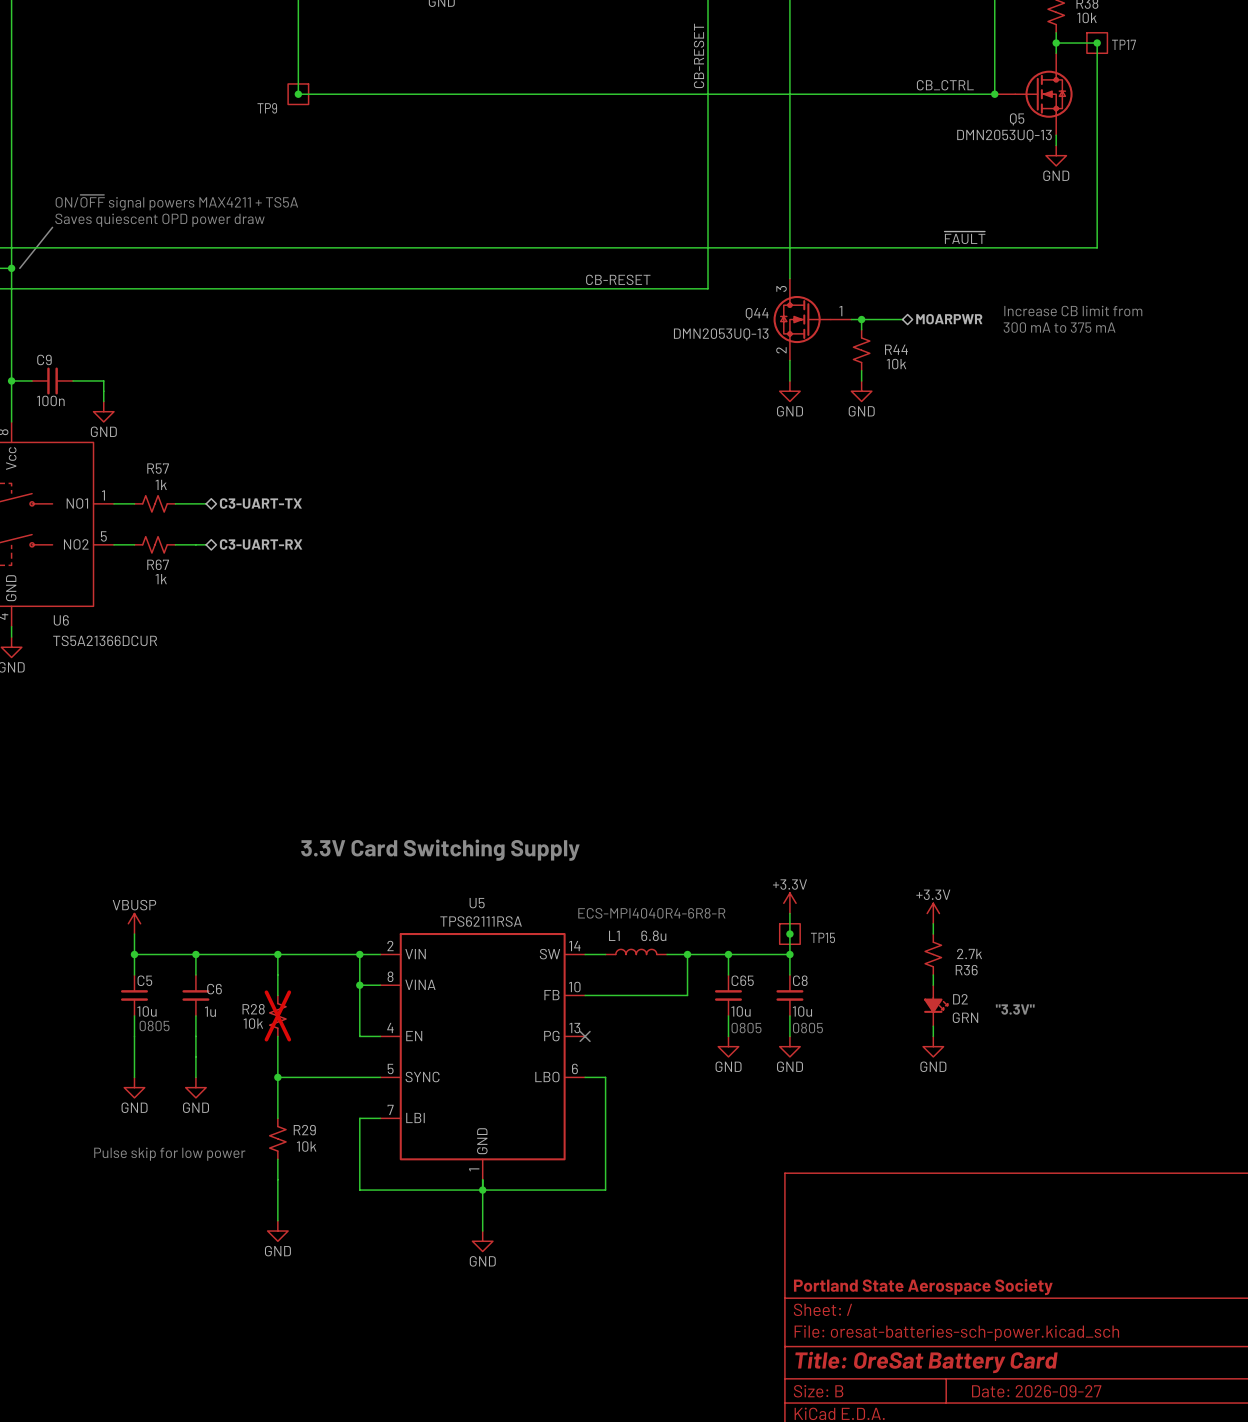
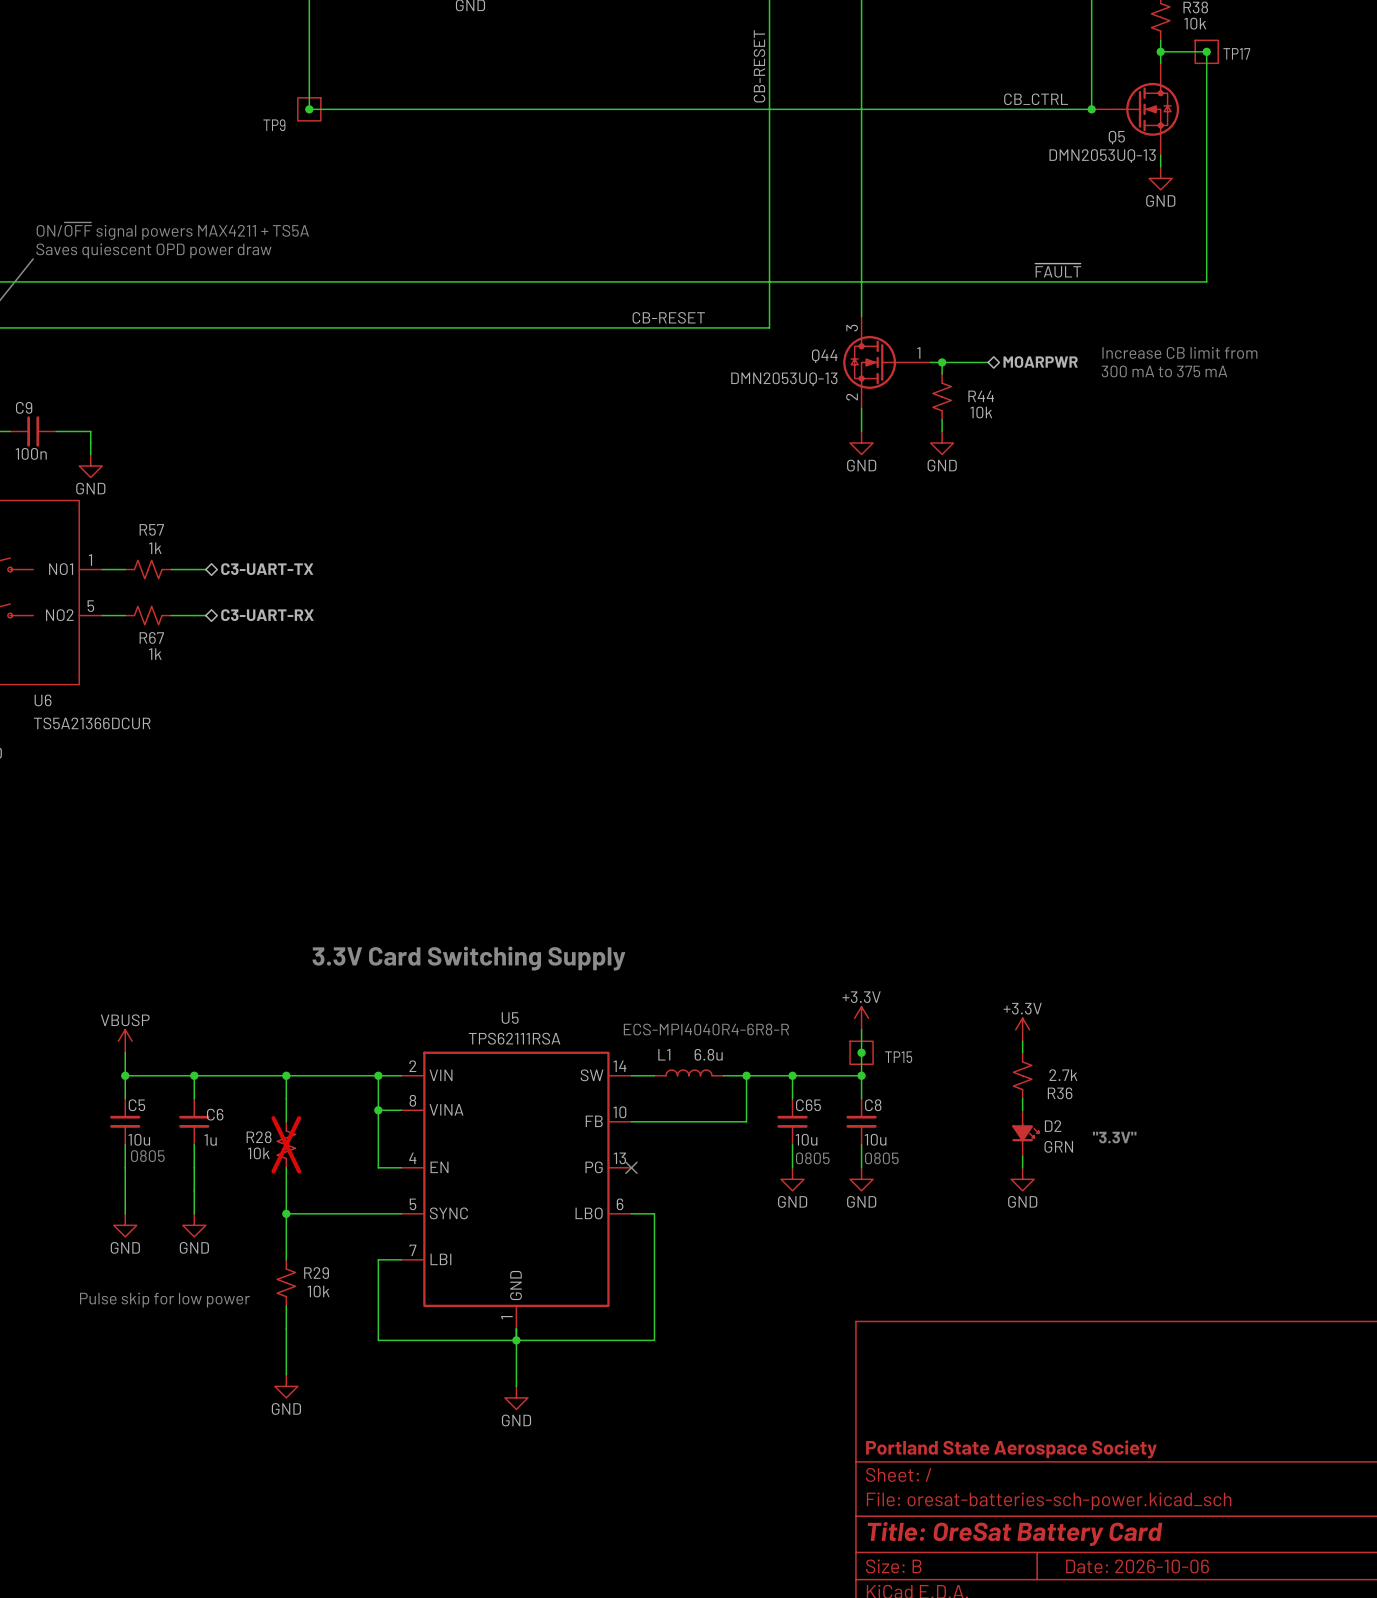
title block: Date: 2026-09-27 (1036, 1391) -> Date: 2026-10-06 (1137, 1566)

